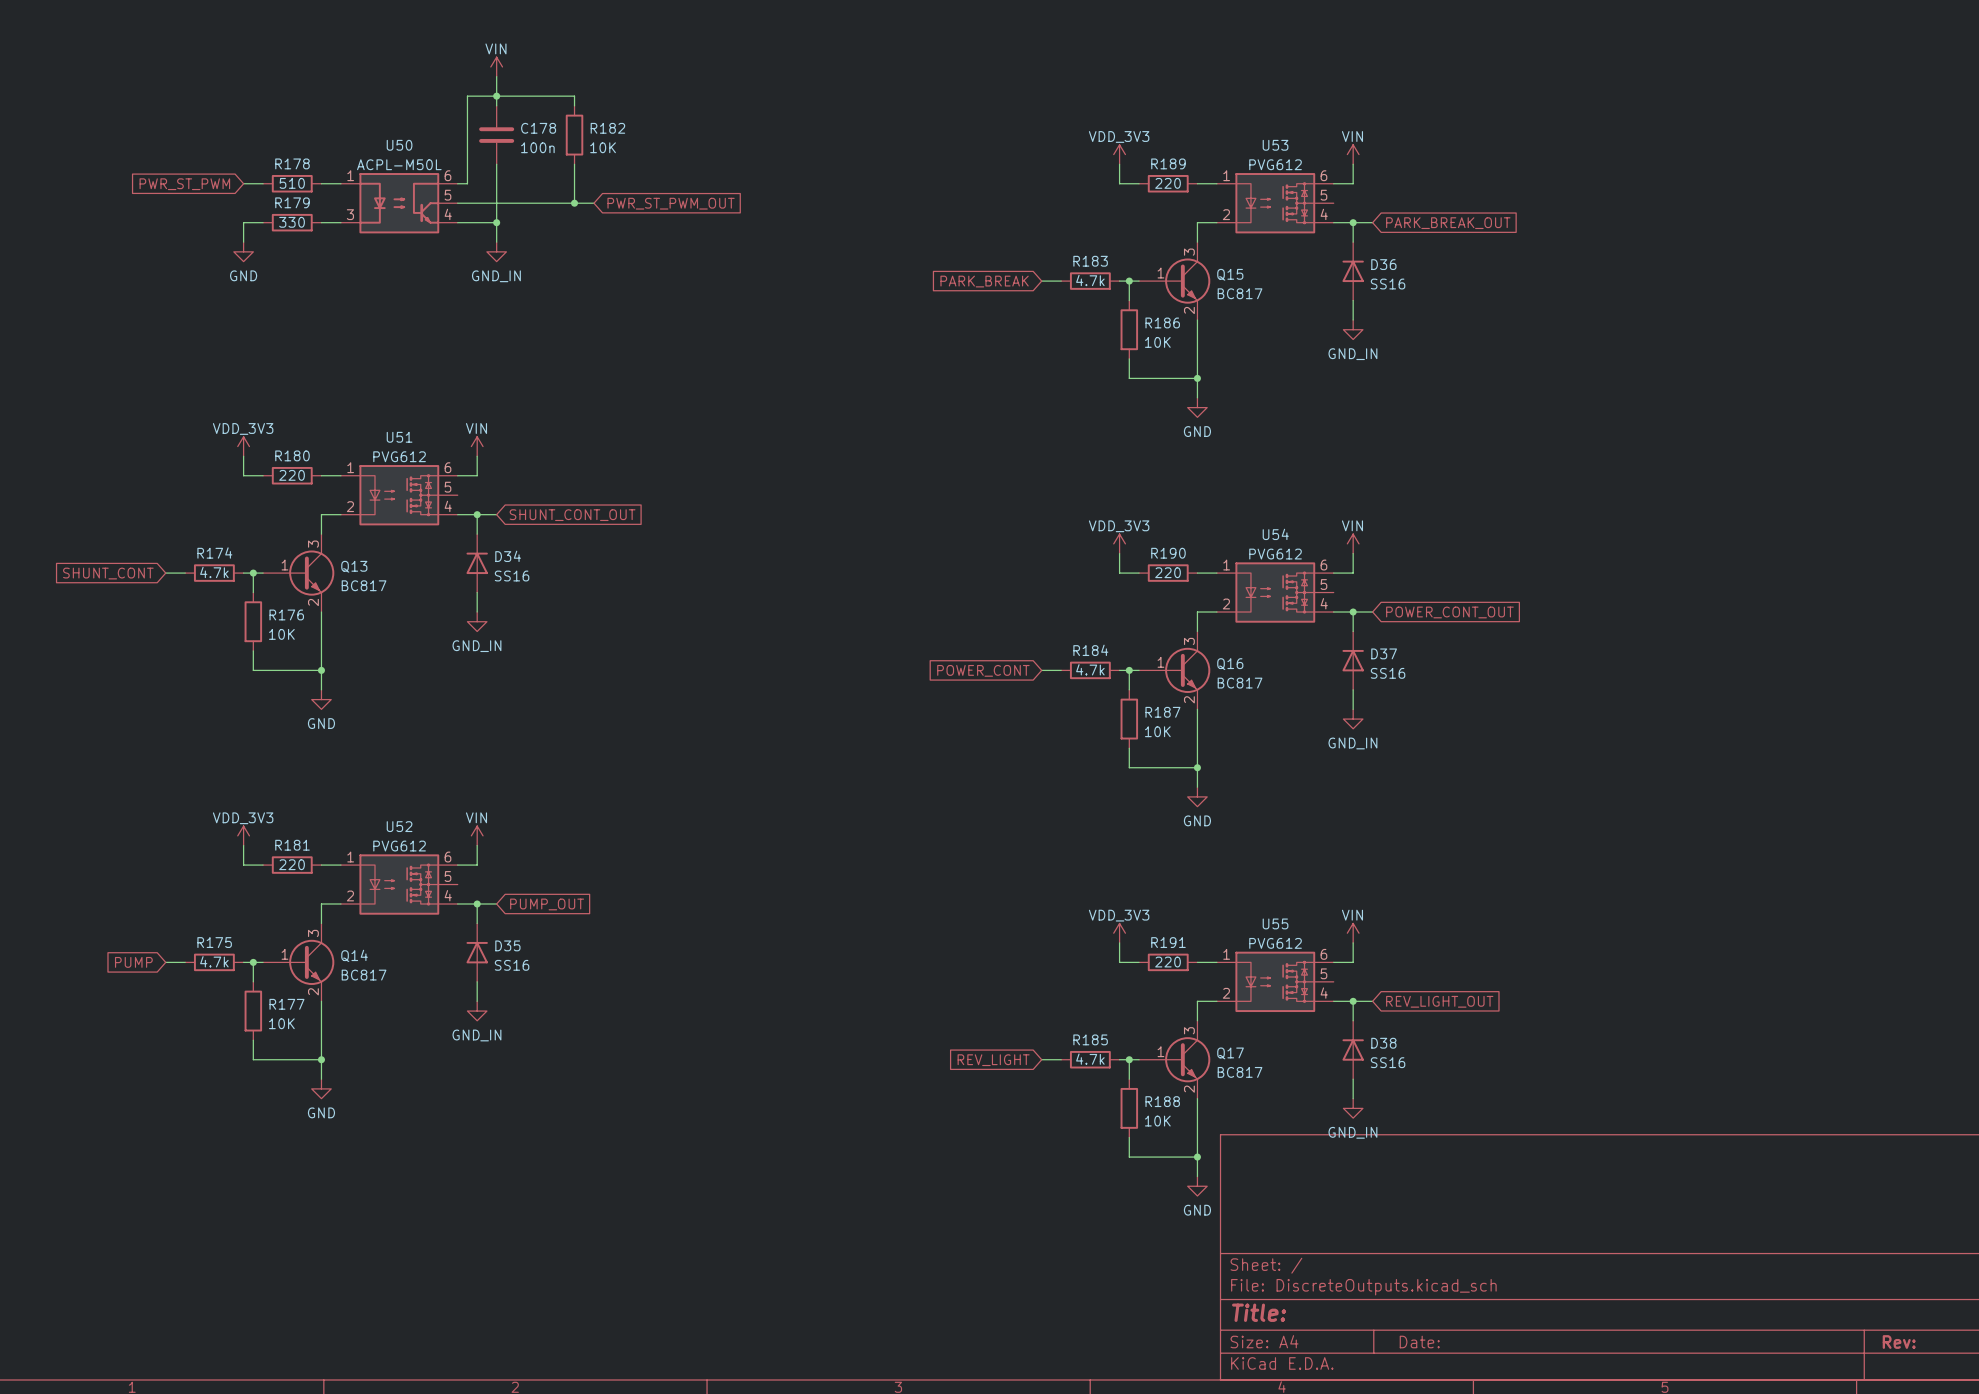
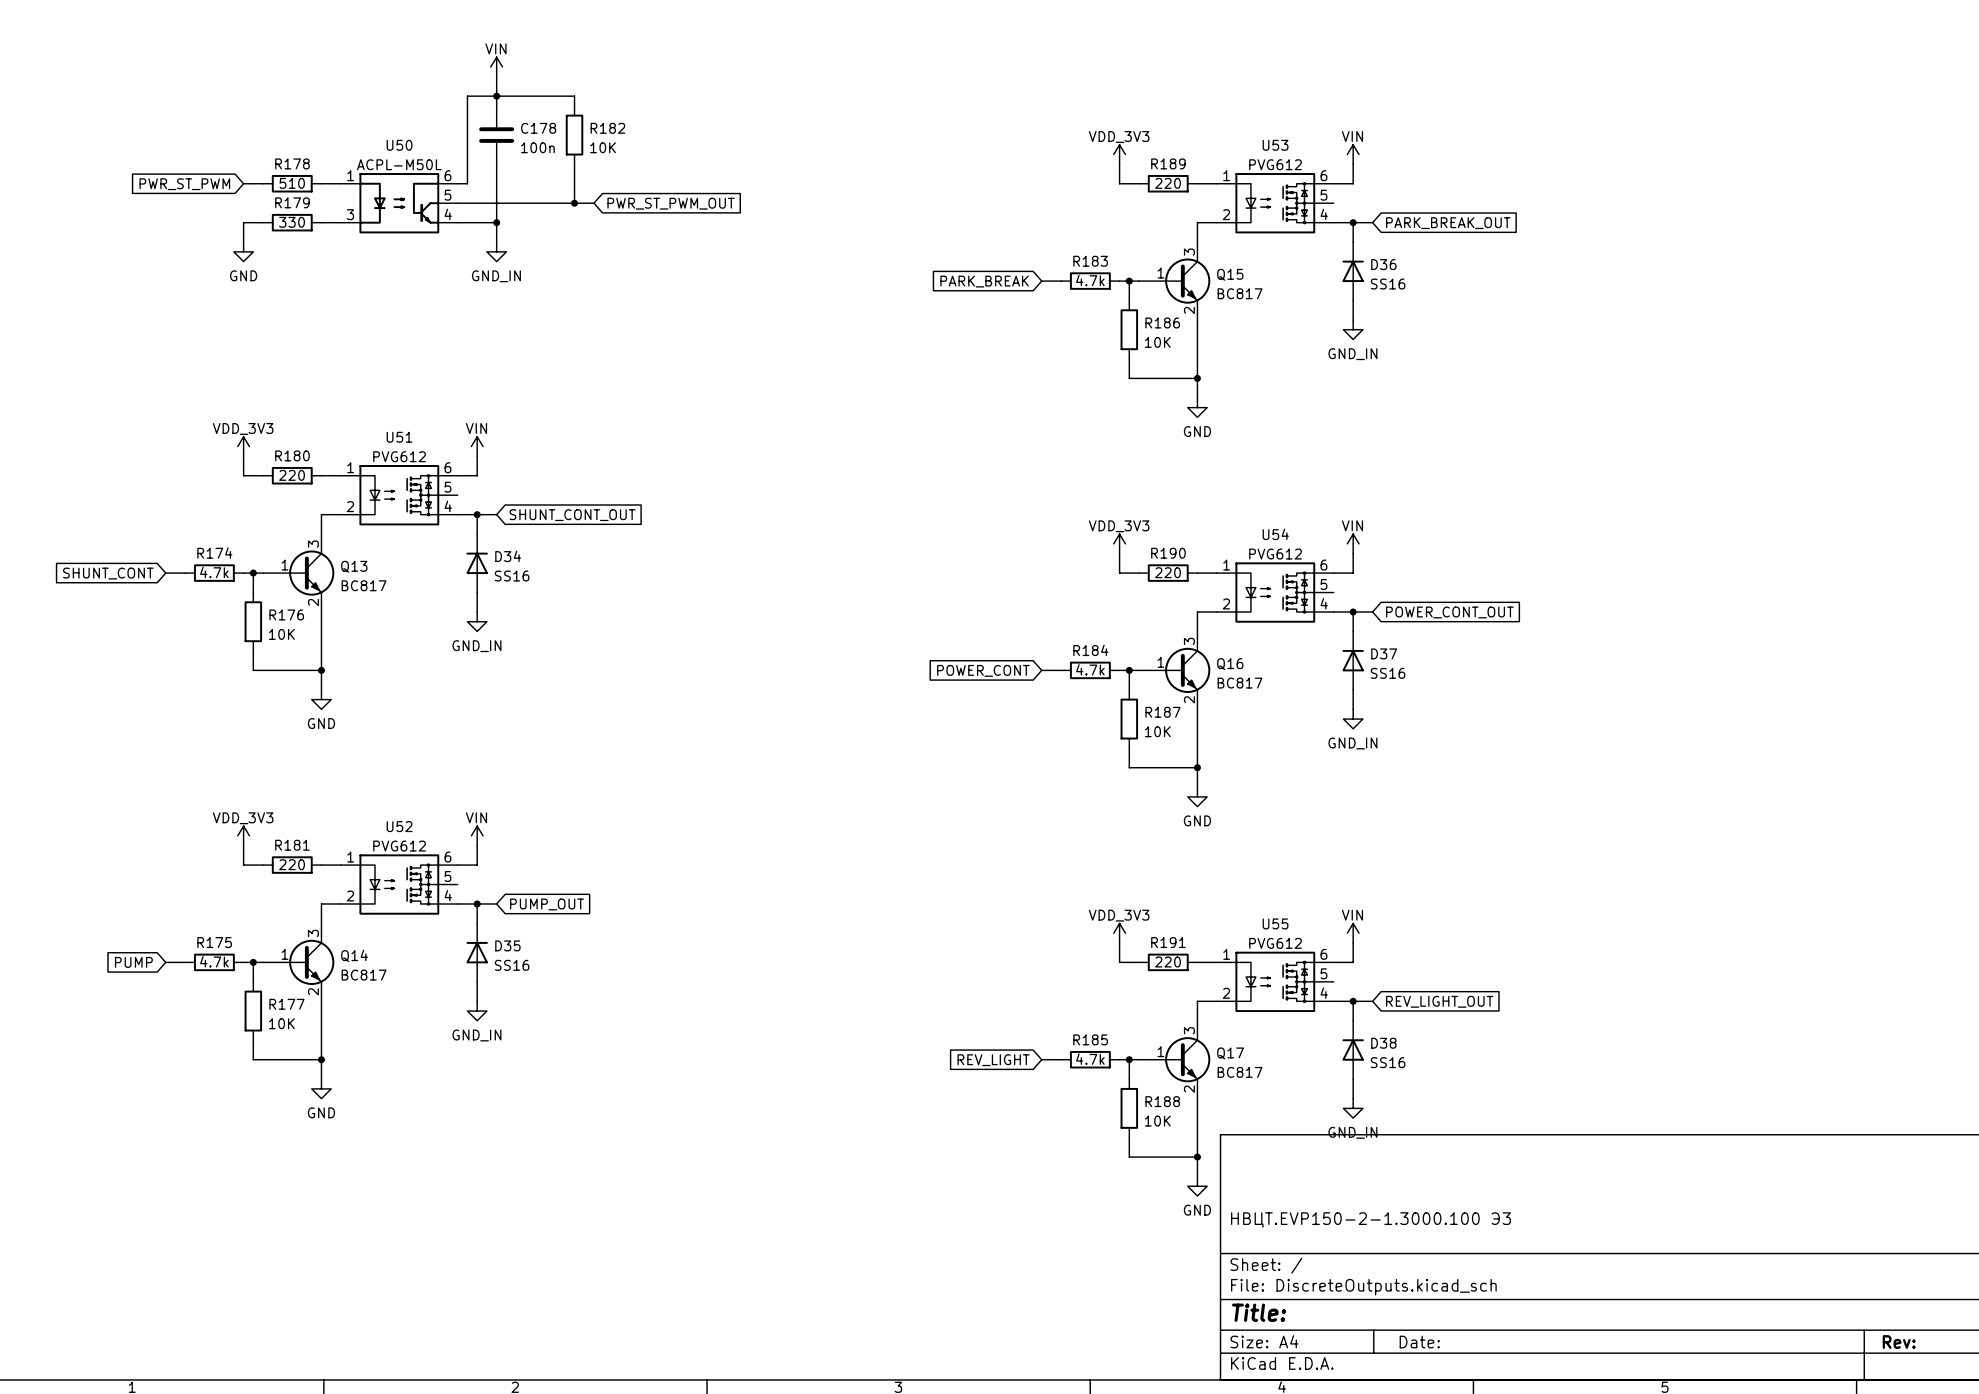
title block: none -> НВЦТ.EVP150-2-1.3000.100 Э3 (1370, 1219)

